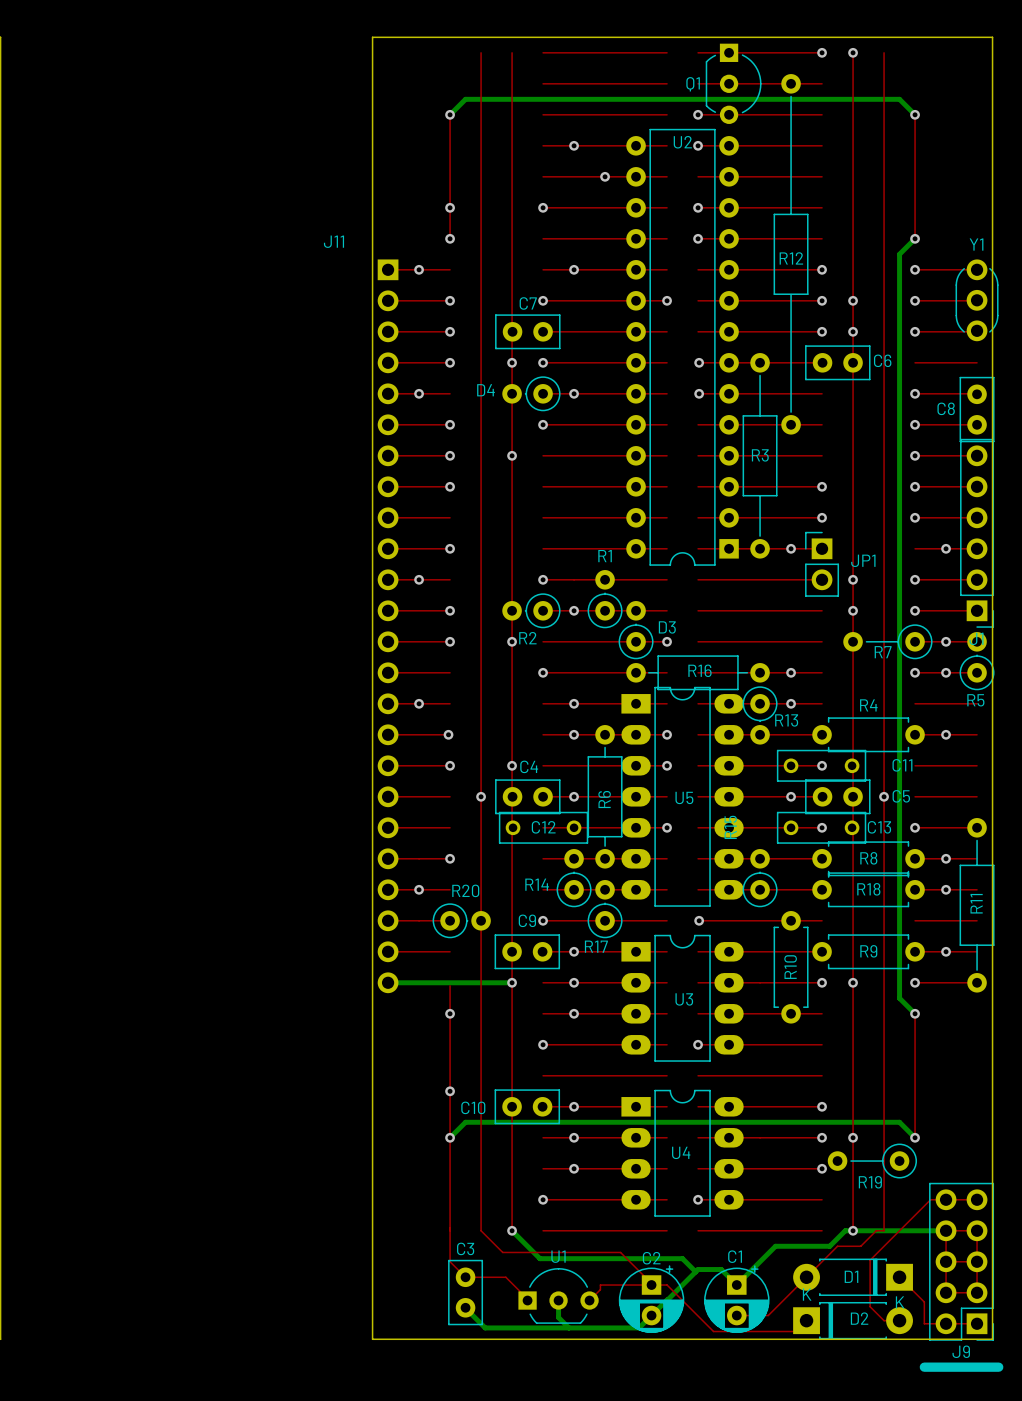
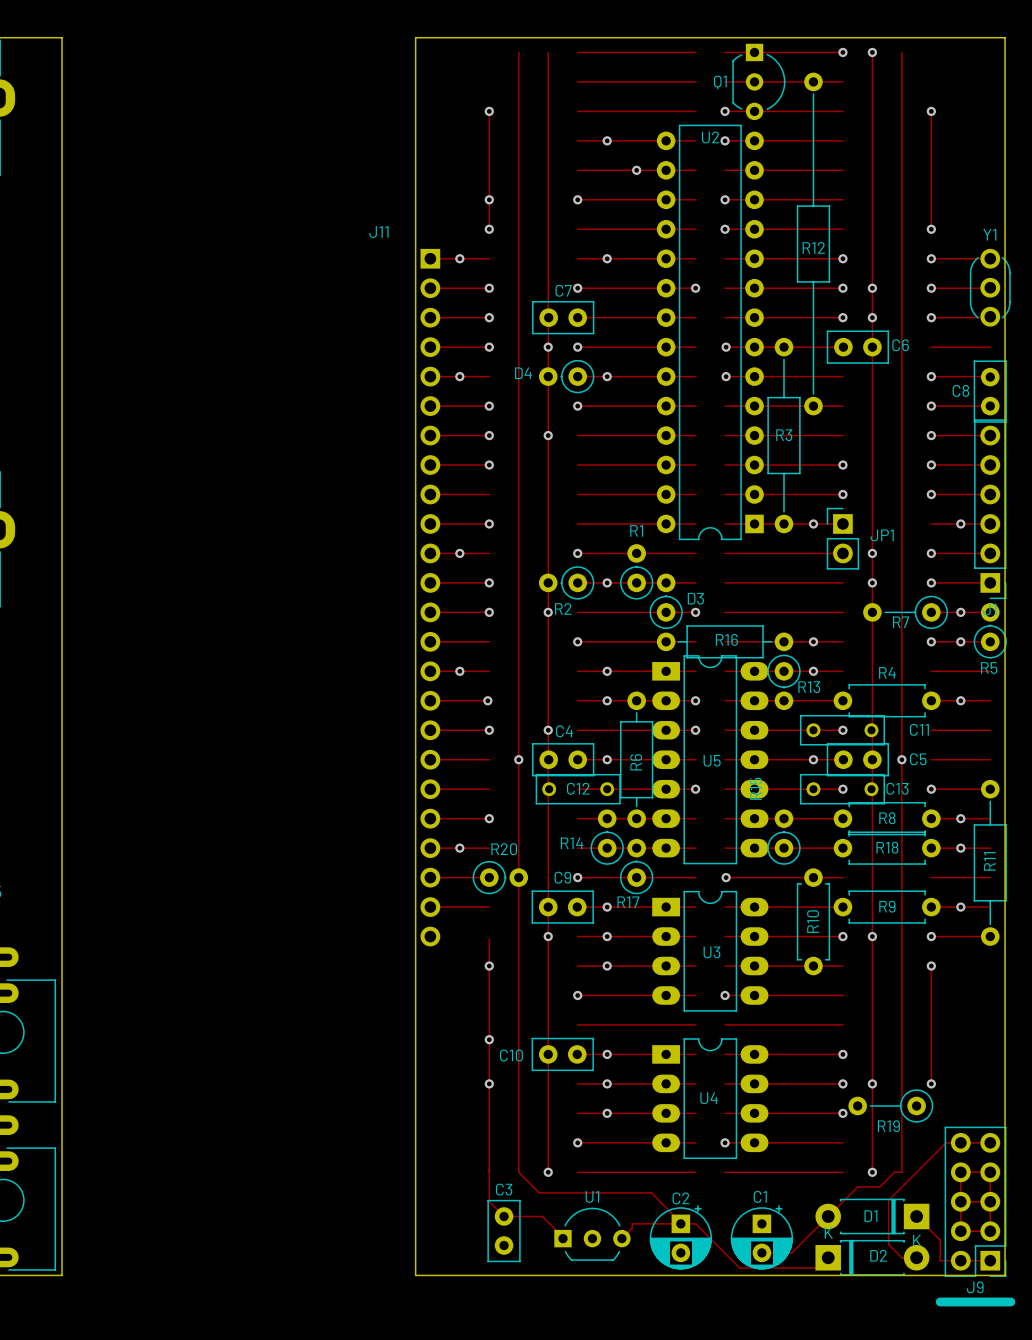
bottom track: (450, 114) (465, 99) (899, 99) (915, 114) -> none
bottom track: (915, 238) (899, 254) (899, 998) (915, 1013) -> none
bottom track: (388, 982) (512, 982) -> none
bottom track: (450, 1137) (465, 1122) (899, 1122) (915, 1137) -> none
bottom track: (512, 1230) (539, 1258) (682, 1258) (695, 1271) -> none
bottom track: (946, 1230) (845, 1230) (829, 1246) (775, 1246) (736, 1285) (721, 1269) (698, 1269) (639, 1327) (485, 1327) (465, 1307) -> none
bottom track: (558, 1300) (558, 1317) (568, 1327) -> none

